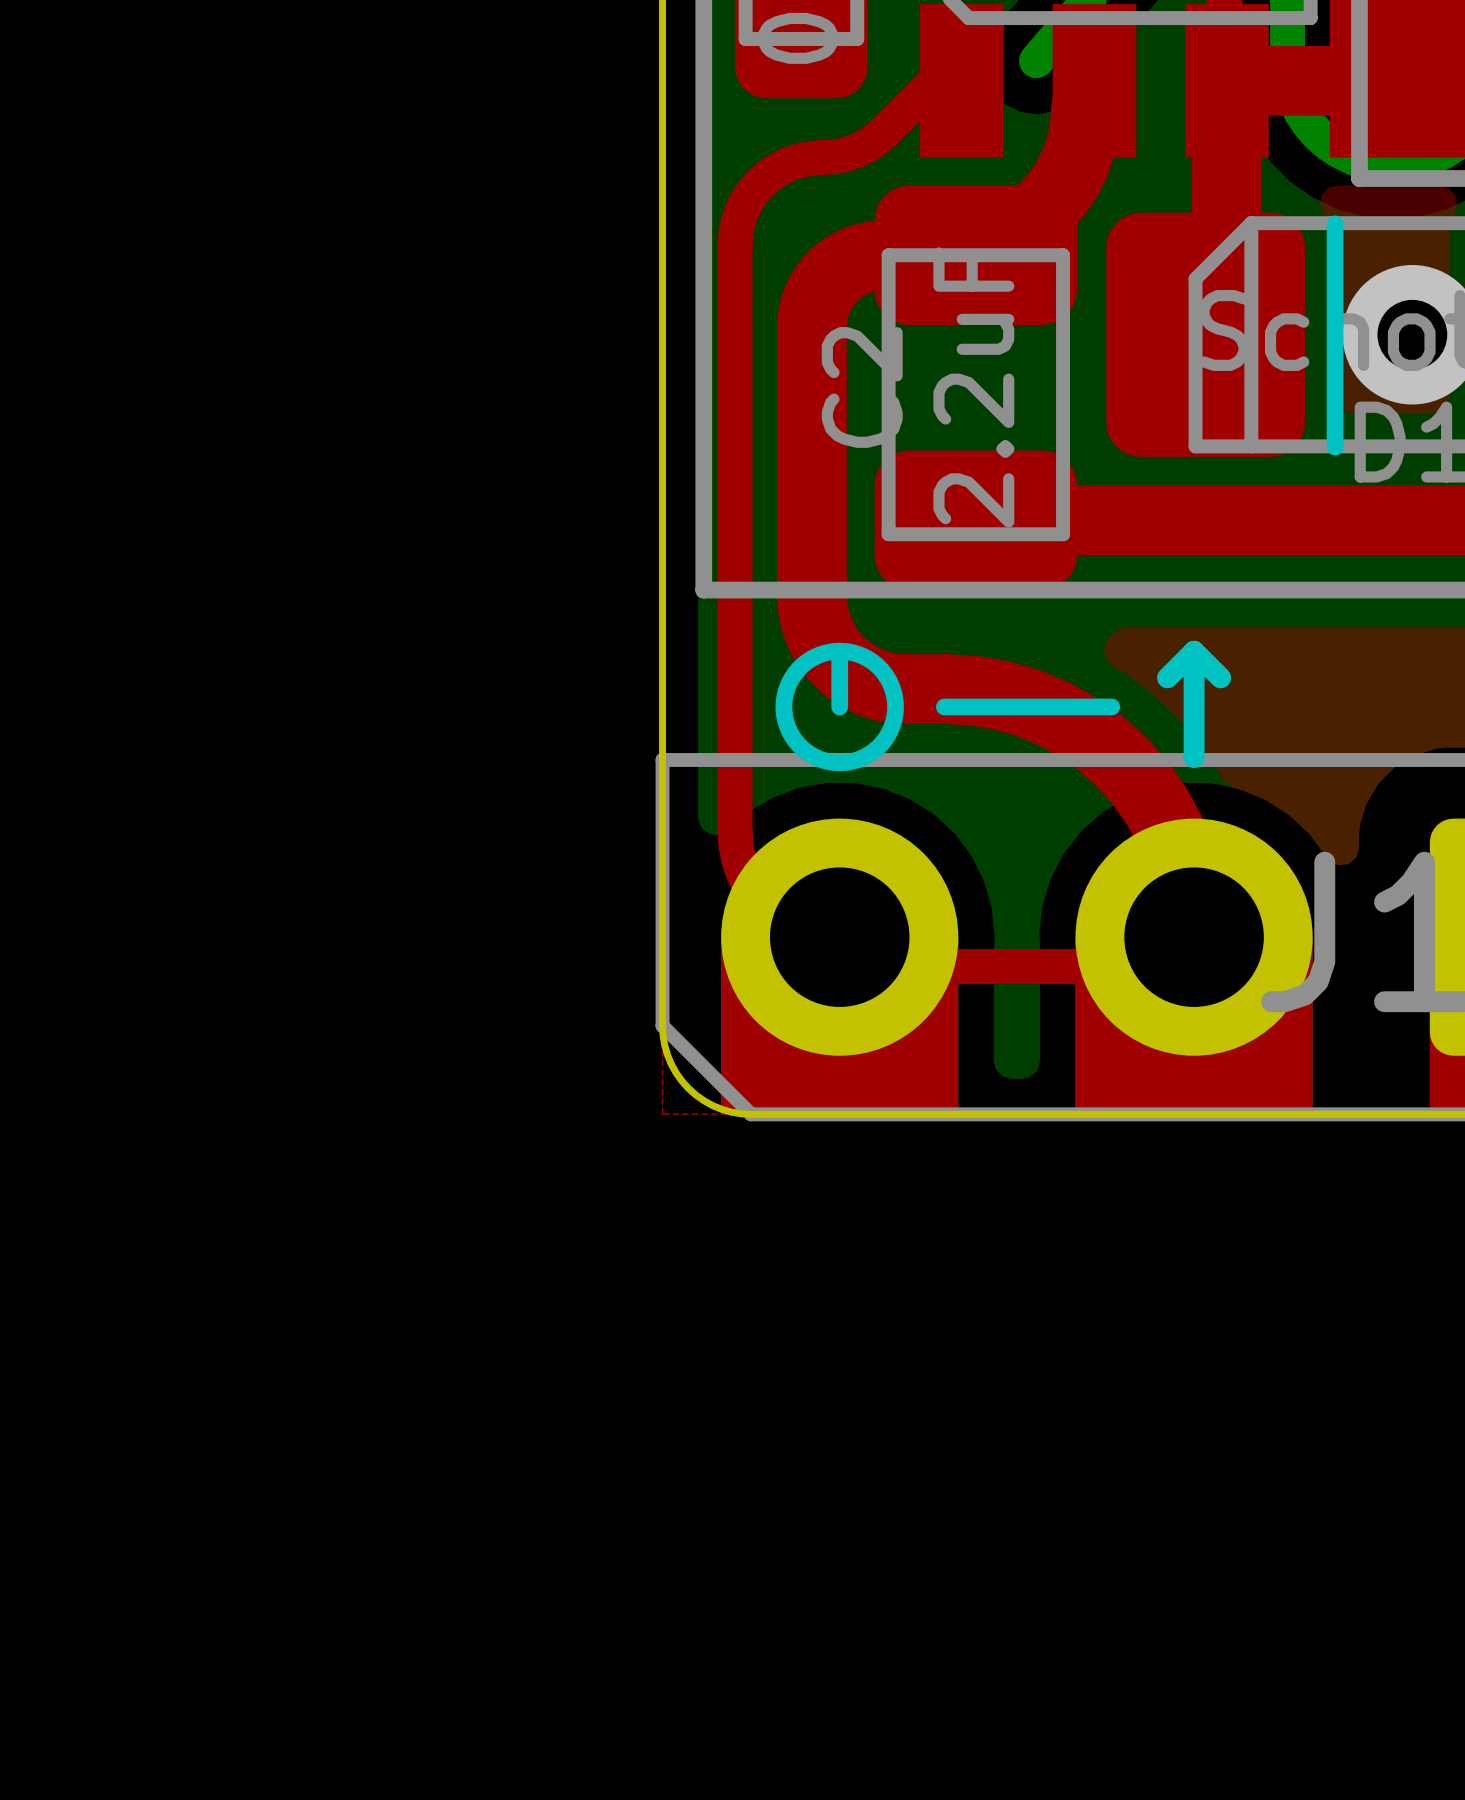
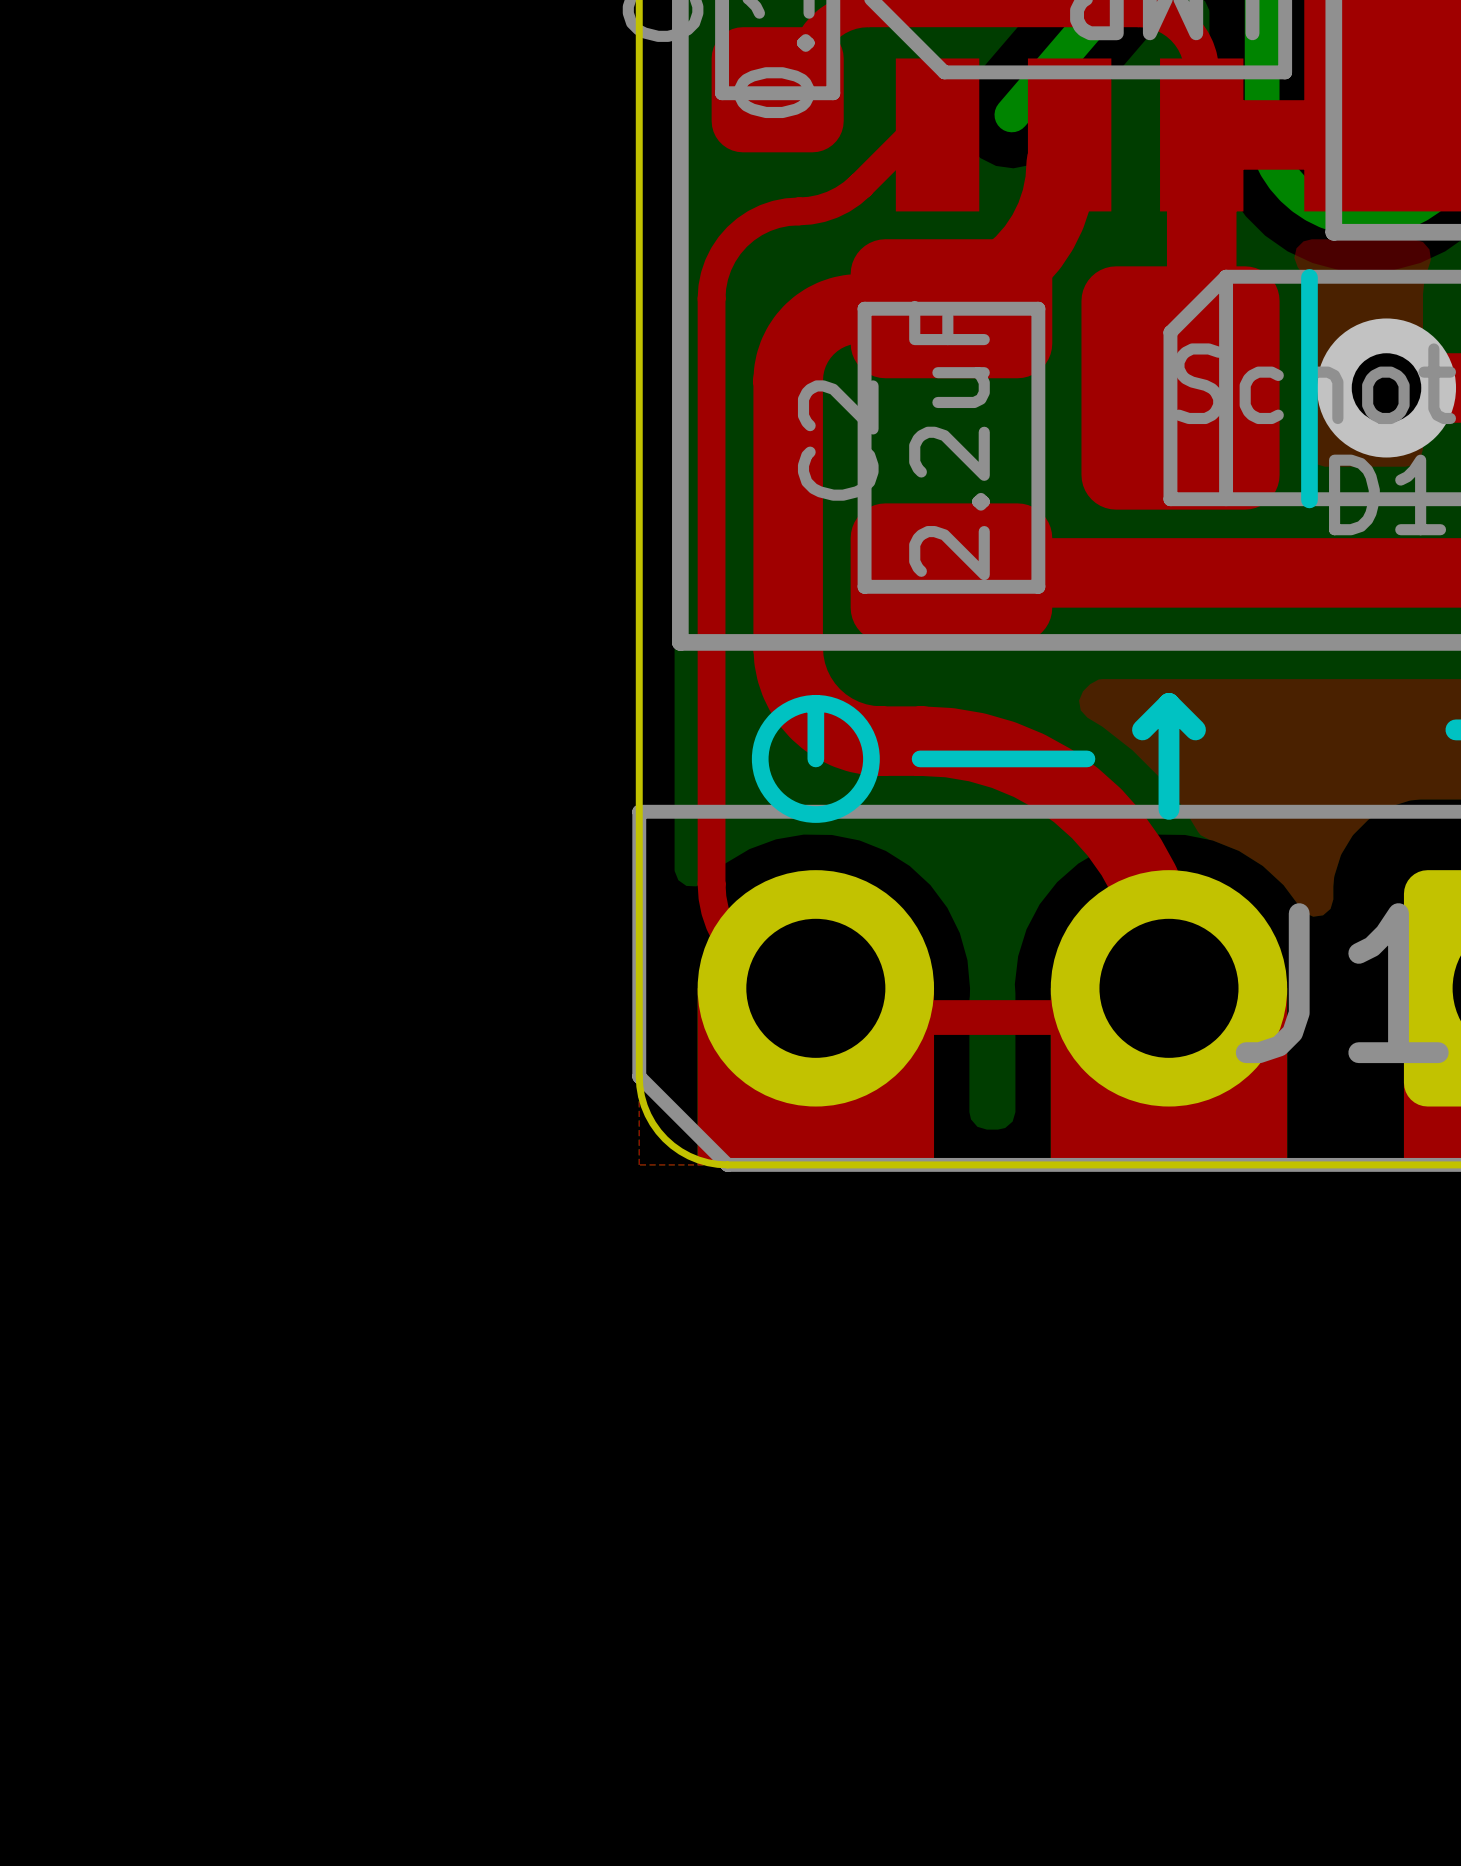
top track width: thick (961, 80) (935, 80) (884, 131) (876, 139) (856, 150) (833, 156) (799, 160) (769, 175) (746, 201) (735, 233) (735, 846) (743, 872) (756, 896) (765, 906) (787, 923) (799, 929) (812, 933) (839, 937) -> thin (937, 134) (911, 134) (860, 185) (832, 204) (810, 210) (776, 214) (745, 229) (723, 254) (712, 287) (712, 897) (719, 923) (733, 947) (742, 957) (763, 974) (775, 980) (788, 984) (815, 988)

